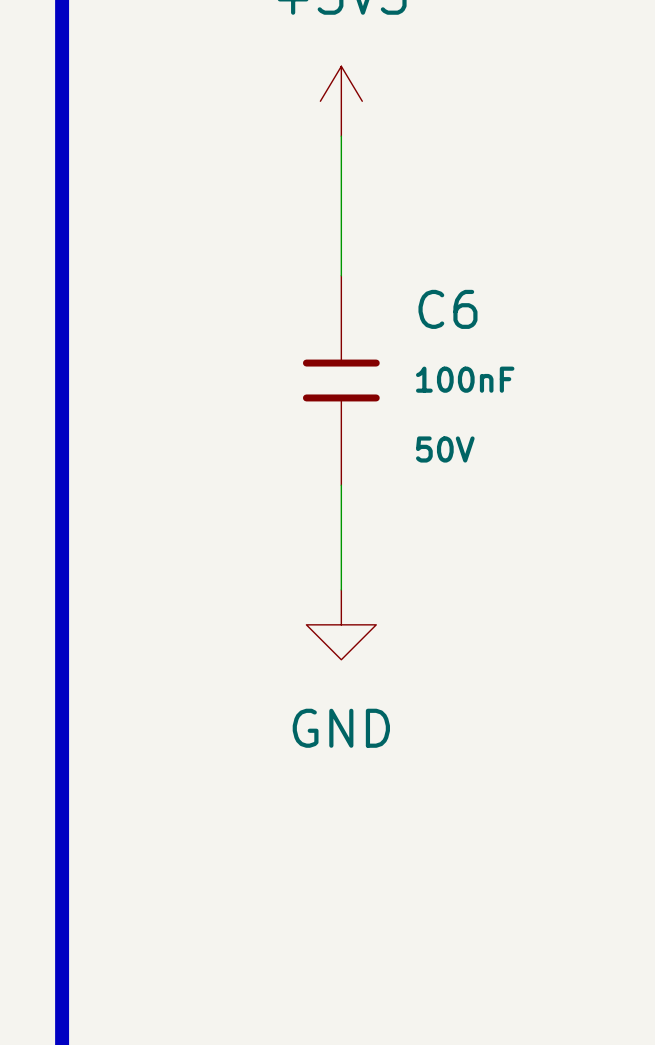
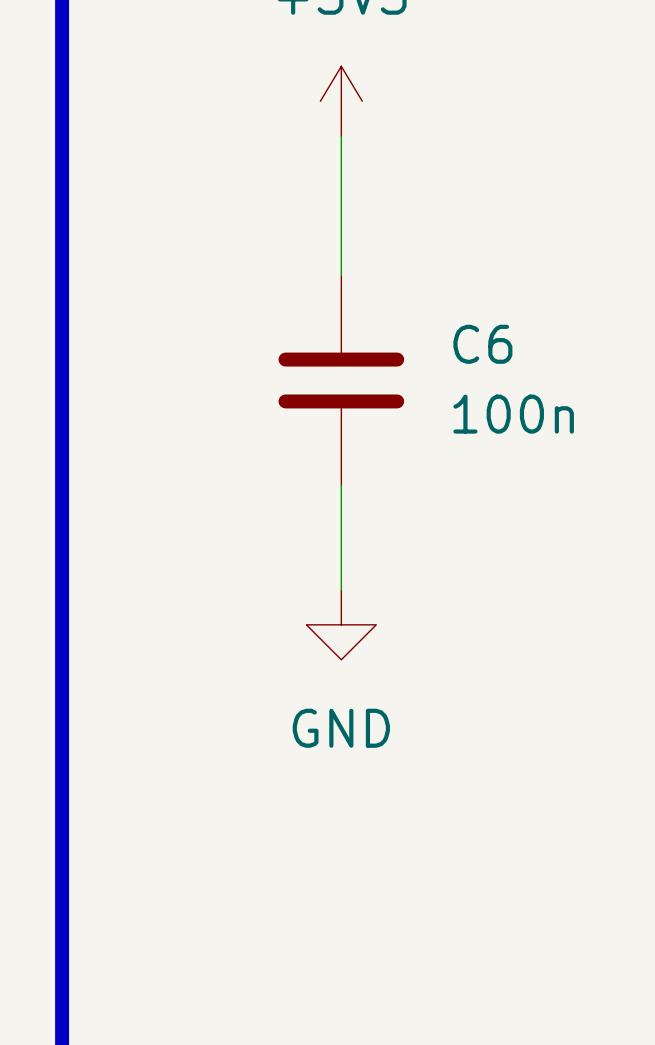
C6 symbol: [302, 275, 380, 486] -> [278, 275, 405, 486]
C6 name position: C6 (447, 309) -> C6 (482, 344)
C6 value: 100nF (465, 379) -> 100n (513, 414)
C6 text: 50V (445, 449) -> none

